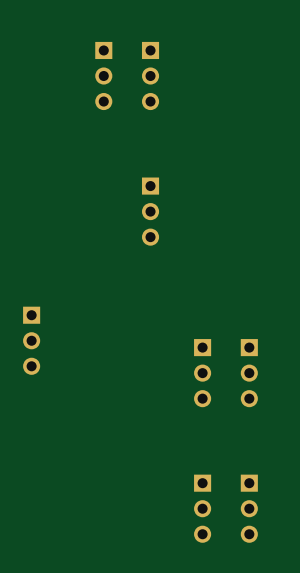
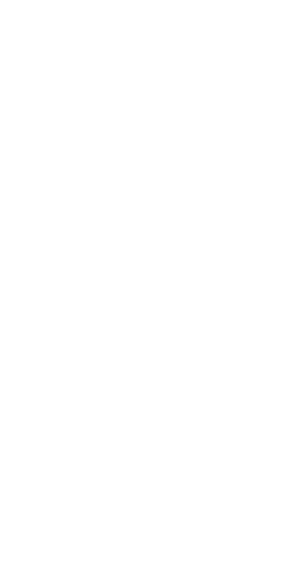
part: (103, 76) -> none
part: (150, 76) -> none
part: (150, 211) -> none
part: (31, 340) -> none
part: (202, 373) -> none
part: (249, 373) -> none
part: (202, 508) -> none
part: (249, 508) -> none

